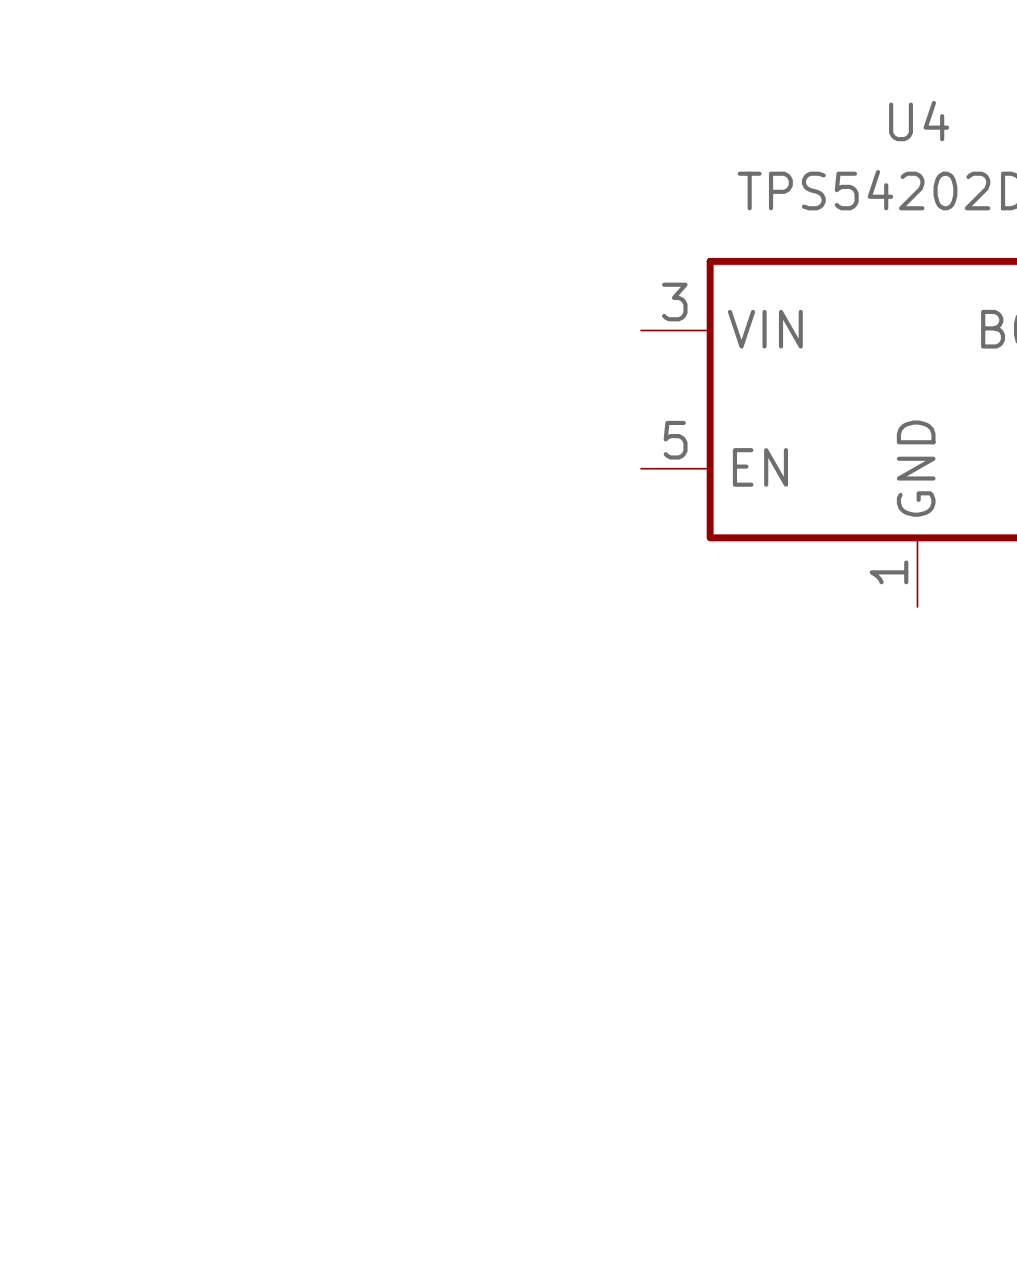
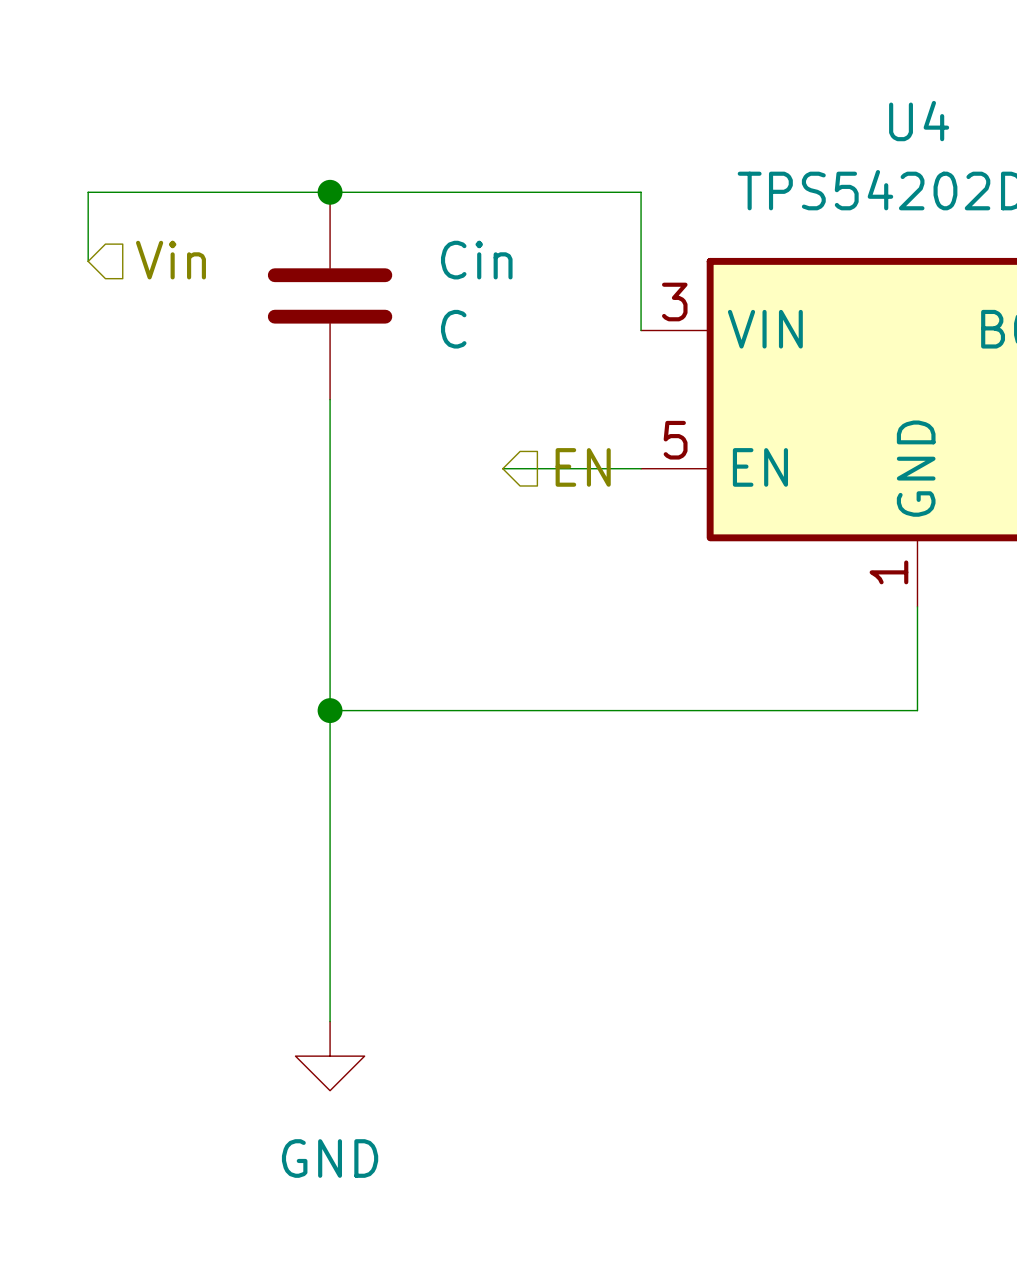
junction: none -> (330, 192)
hierarchical label: none -> Vin (170, 260)
wire: none -> (88, 261) (88, 192) (641, 192) (641, 330)
Cin: none -> C (330, 295)
wire: none -> (330, 399) (330, 1021)
hierarchical label: none -> EN (583, 467)
wire: none -> (502, 468) (641, 468)
wire: none -> (917, 606) (917, 710) (330, 710)
junction: none -> (330, 710)
power symbol: none -> GND (330, 1056)

